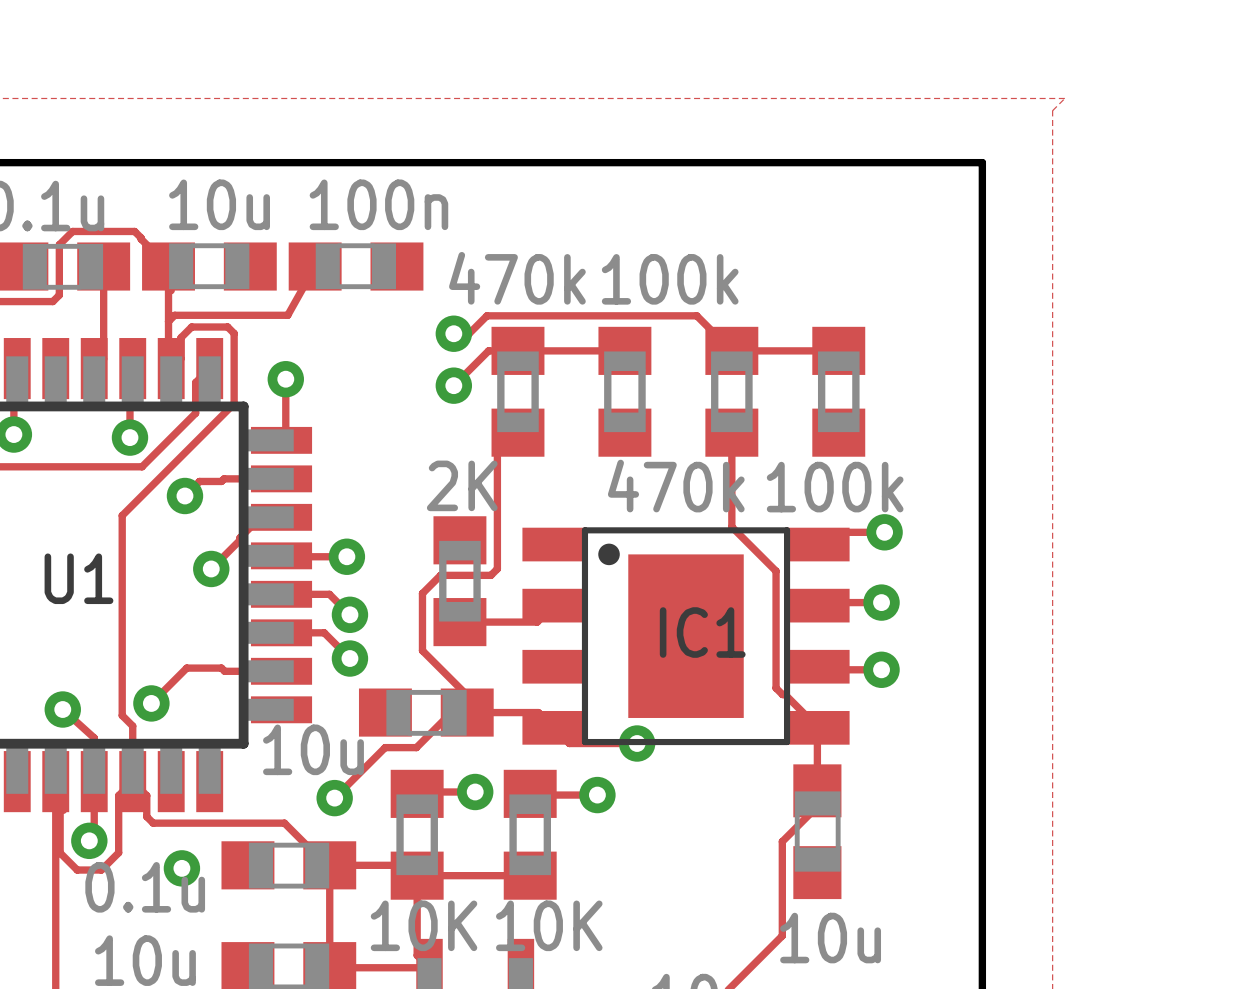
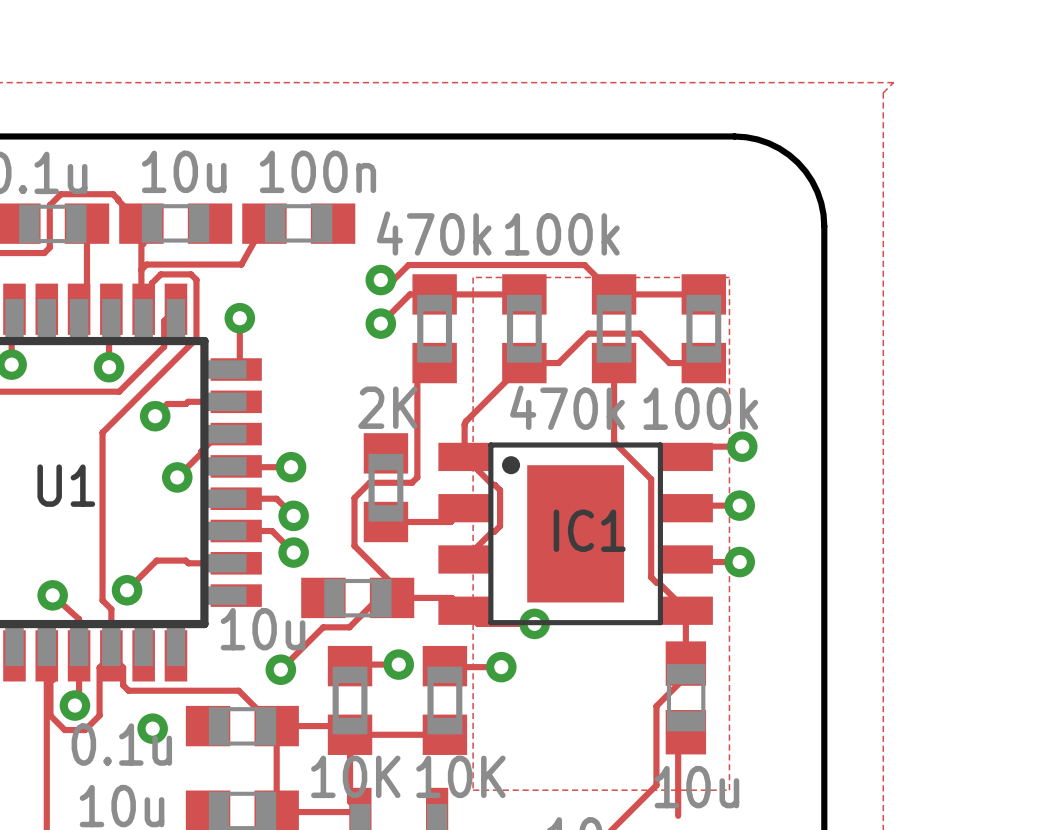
board edge: (875, 162) (982, 162) (982, 269) -> (734, 136) (746, 137) (768, 143) (789, 155) (797, 162) (805, 171) (817, 191) (823, 214) (824, 226)
zone outline: none -> (473, 277) (473, 790) (729, 790) (729, 277) (473, 277)
track: none -> (703, 363) (669, 363) (640, 333) (588, 333) (558, 363) (524, 363) (464, 423) (464, 456) (500, 490) (500, 526) (464, 559)
track: none -> (685, 732) (678, 741) (678, 815)

